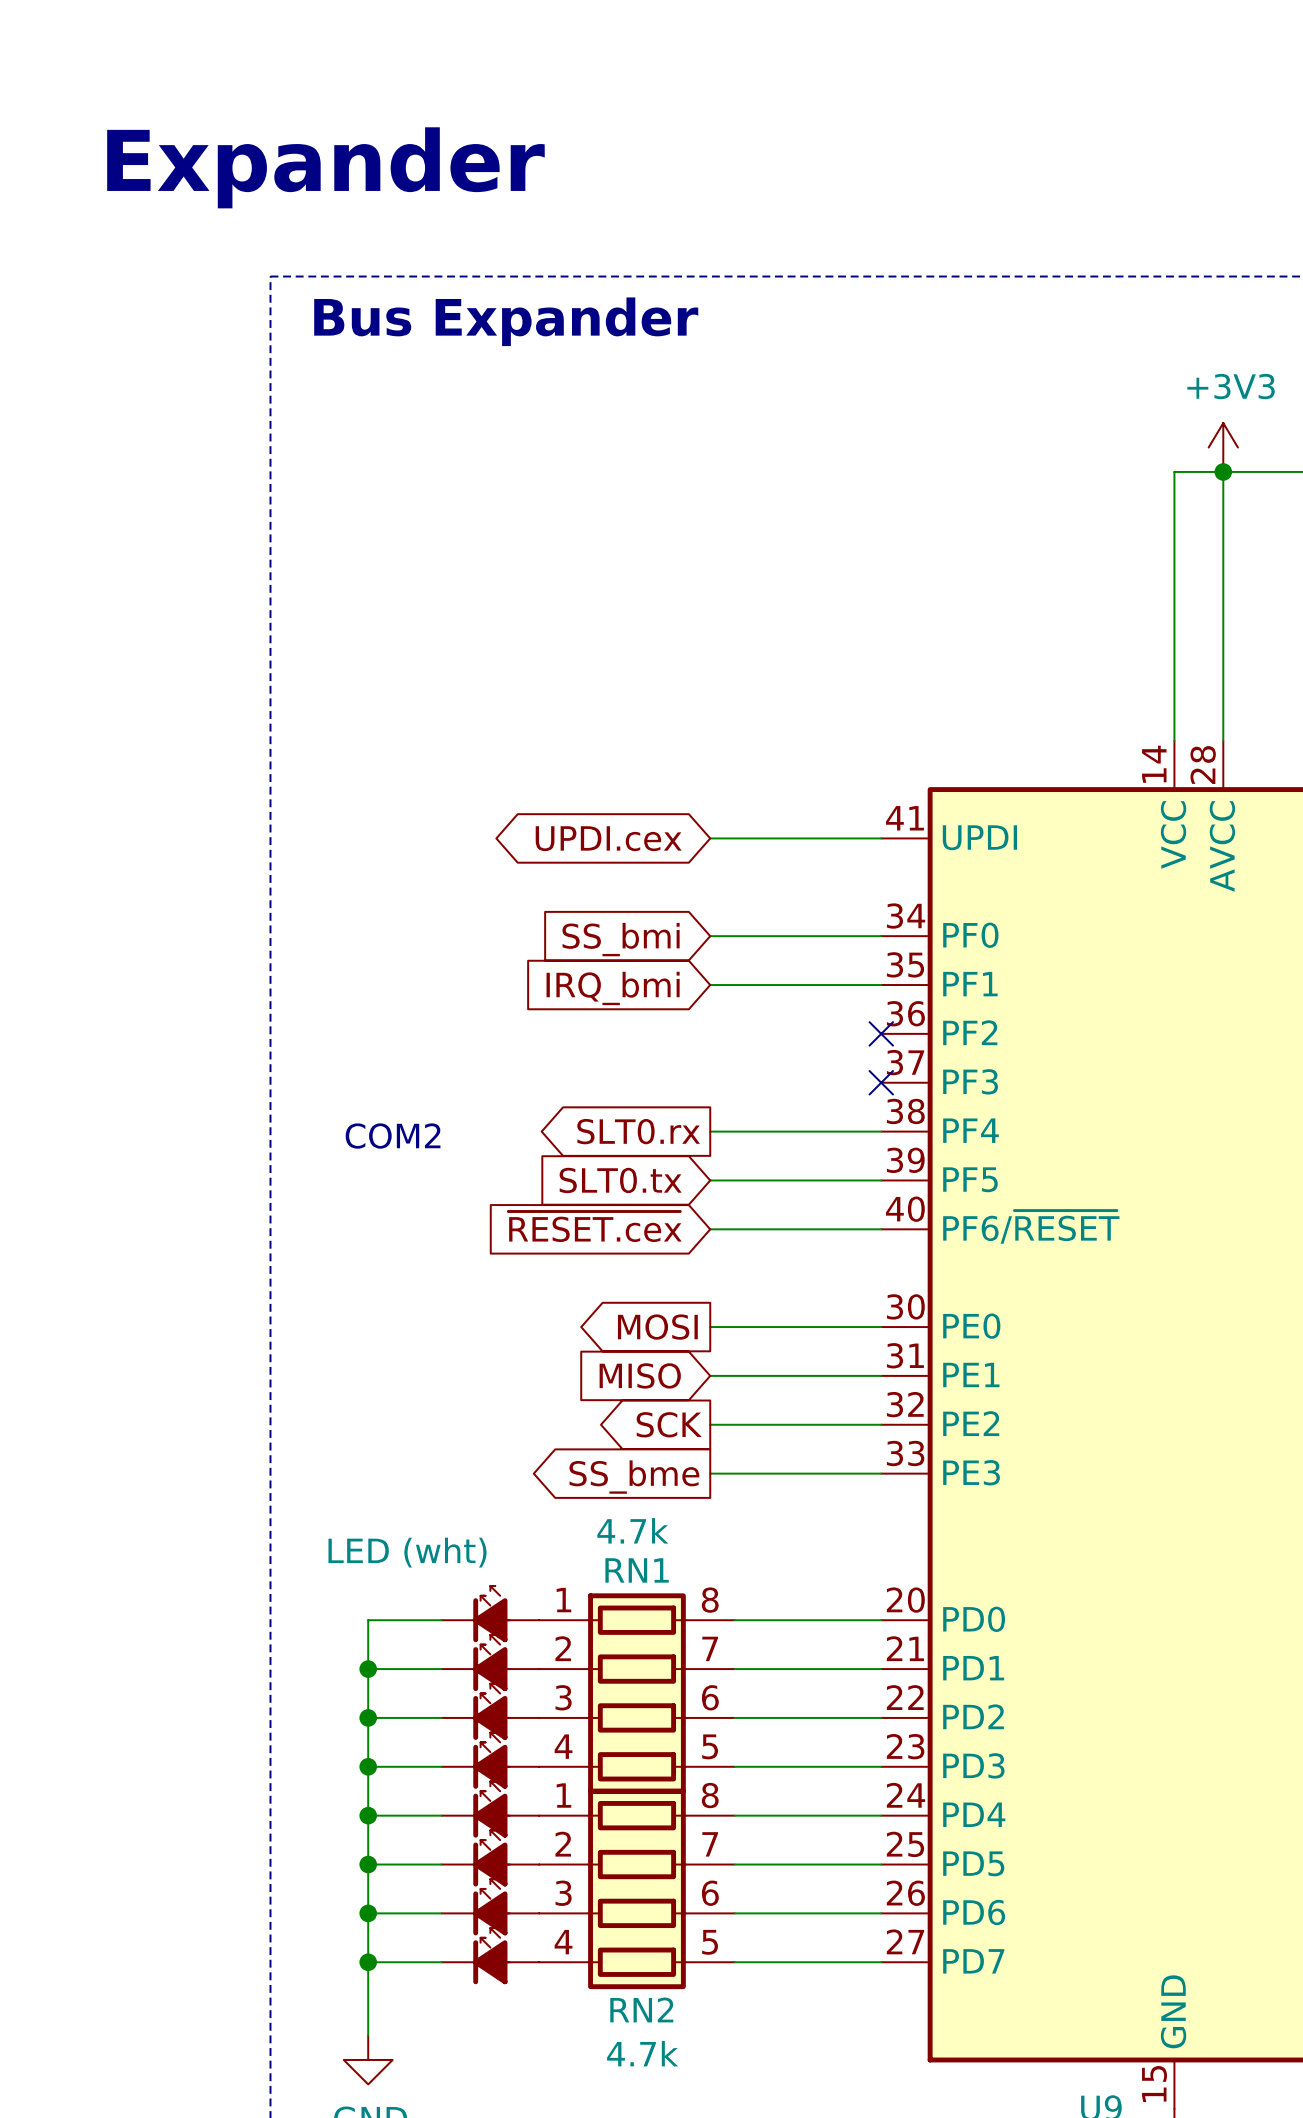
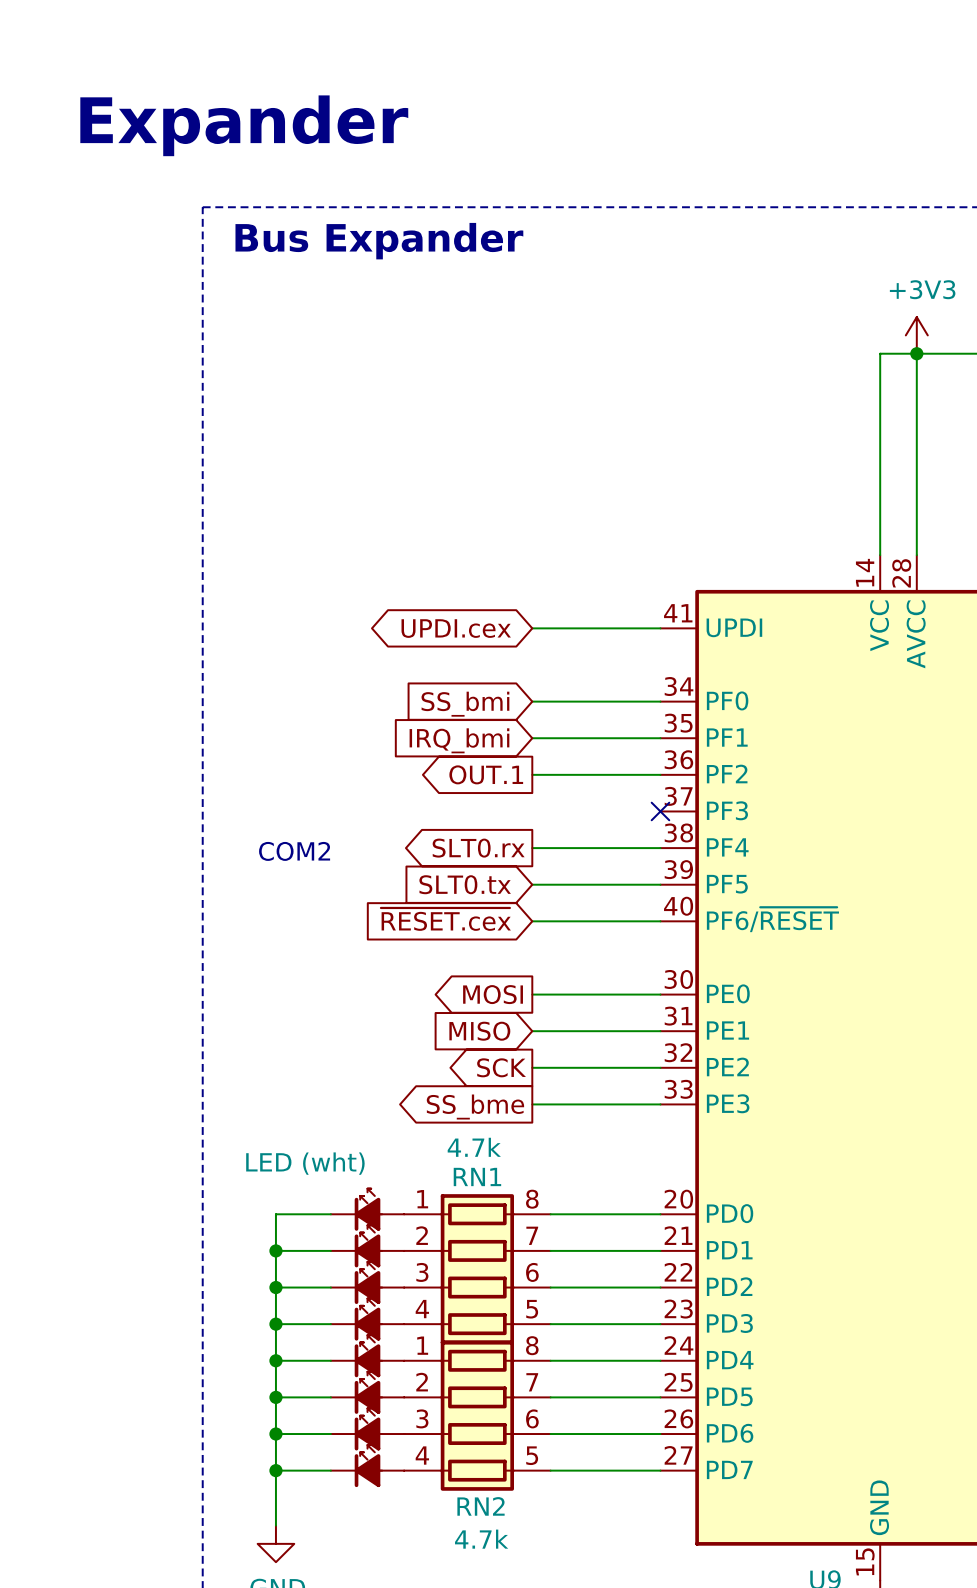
global label: none -> OUT.1 (486, 774)
wire: none -> (532, 774) (660, 774)
no-connect mark: (881, 1033) -> none

